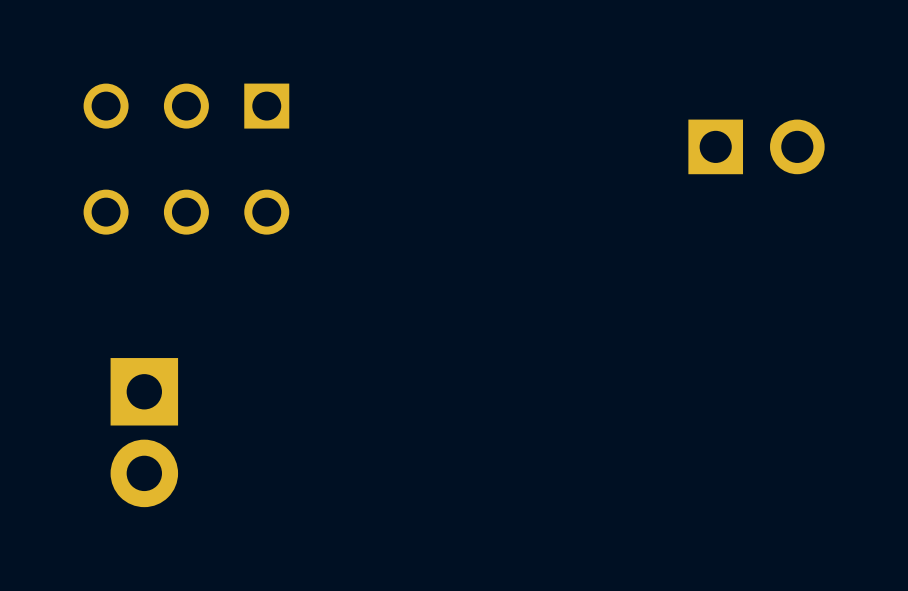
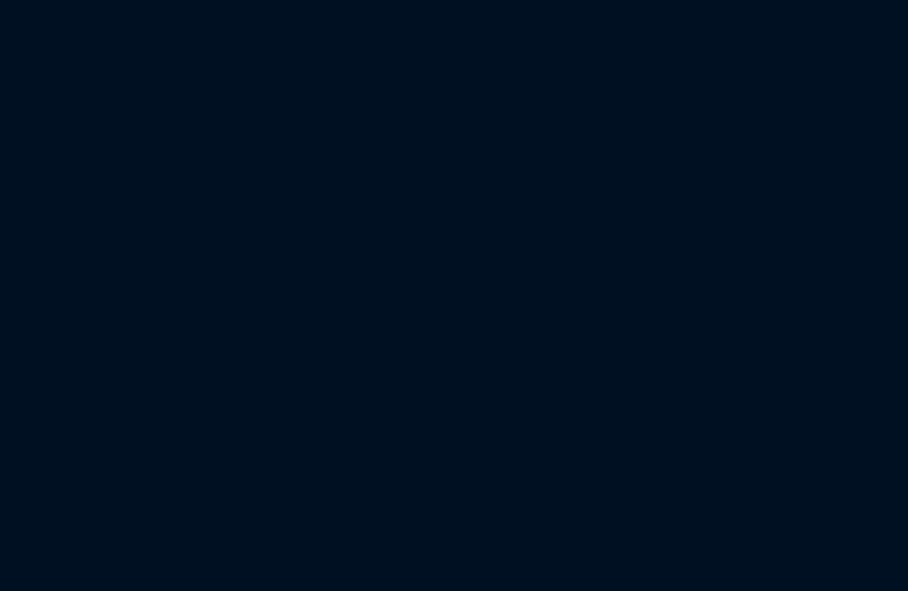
part: (756, 146) -> none
part: (186, 159) -> none
part: (144, 432) -> none

